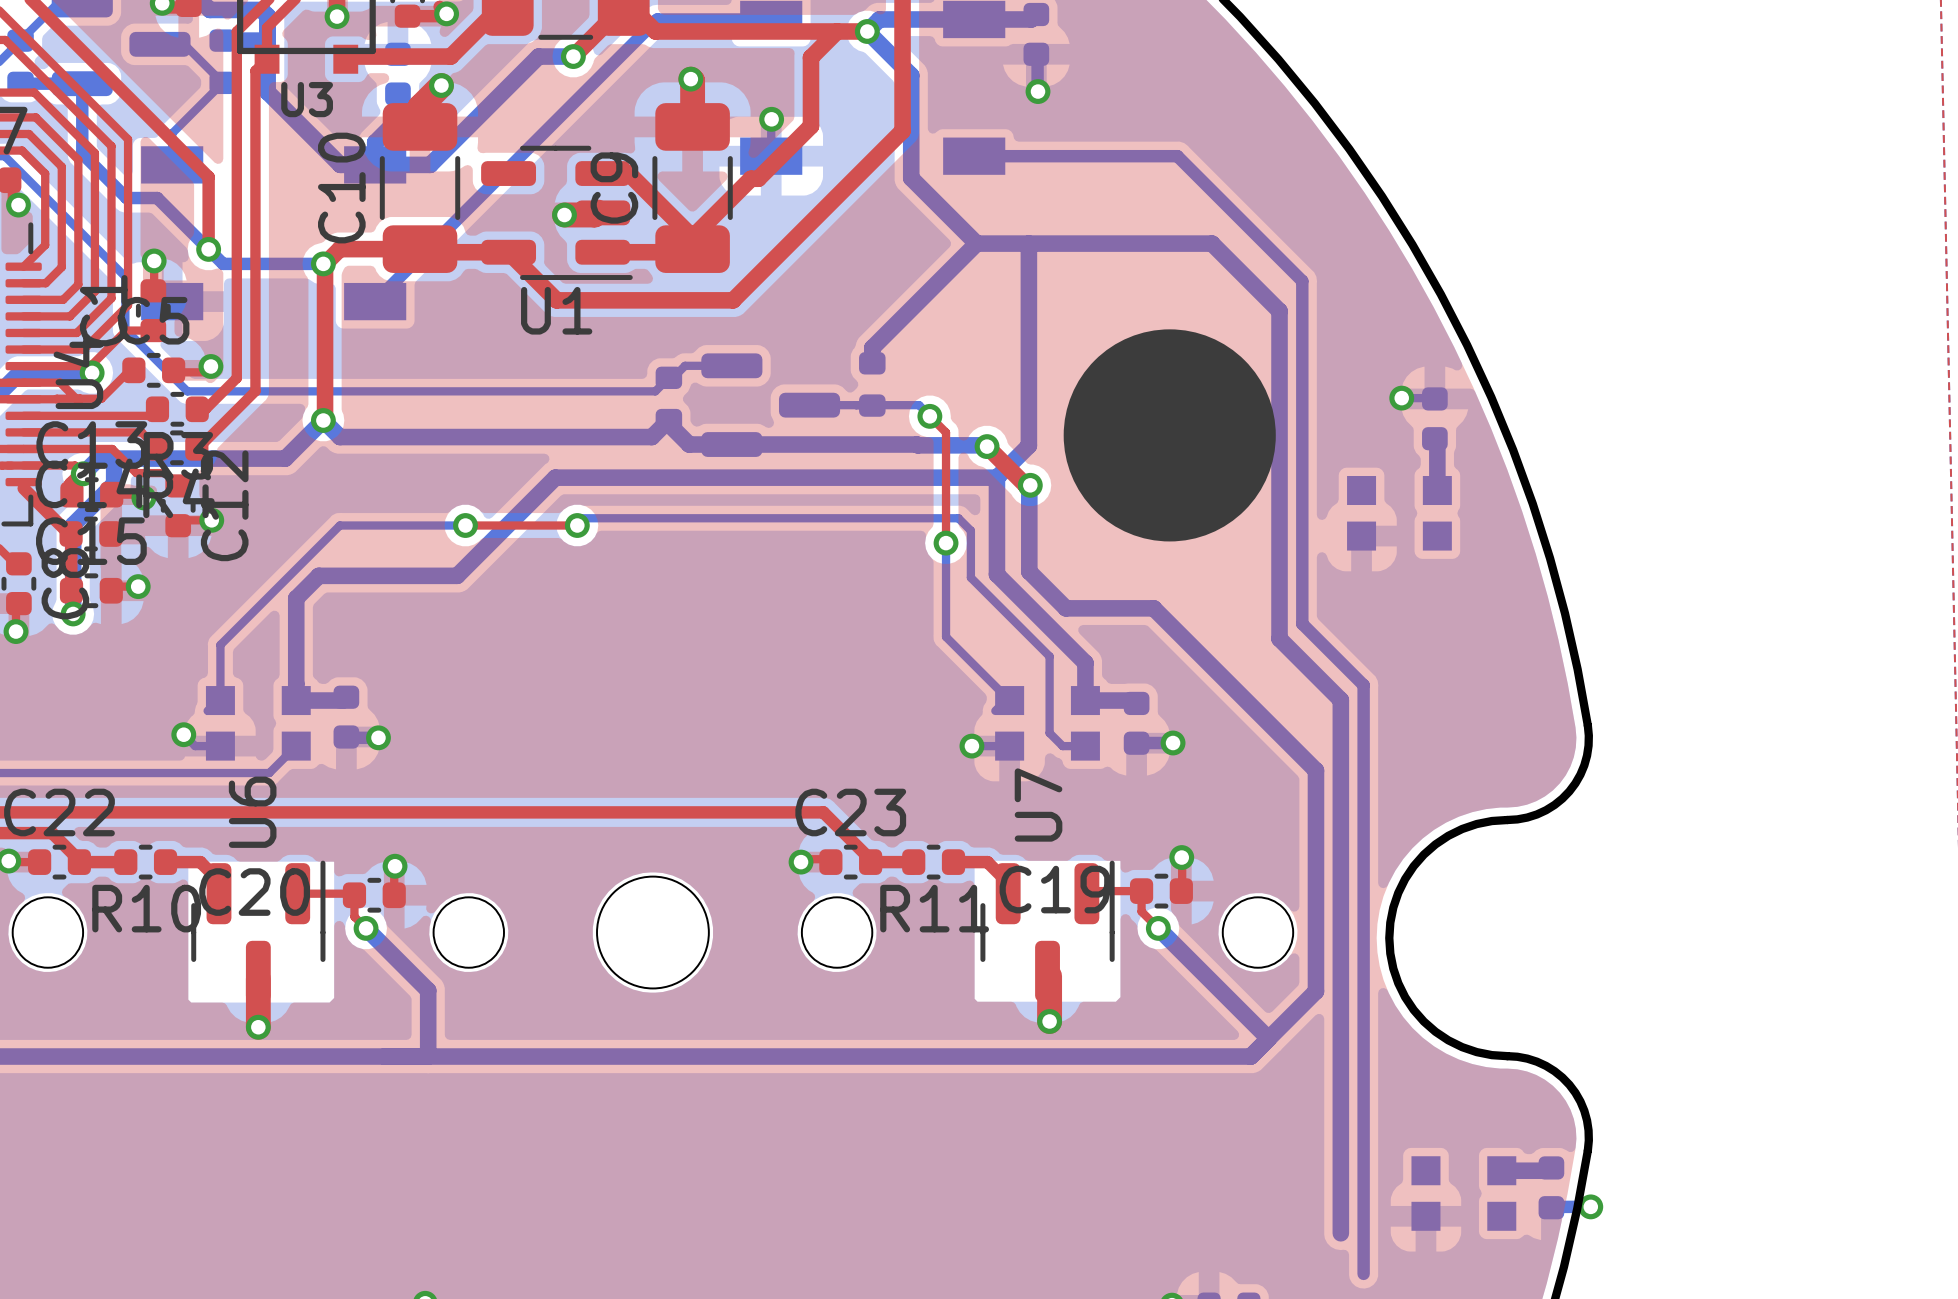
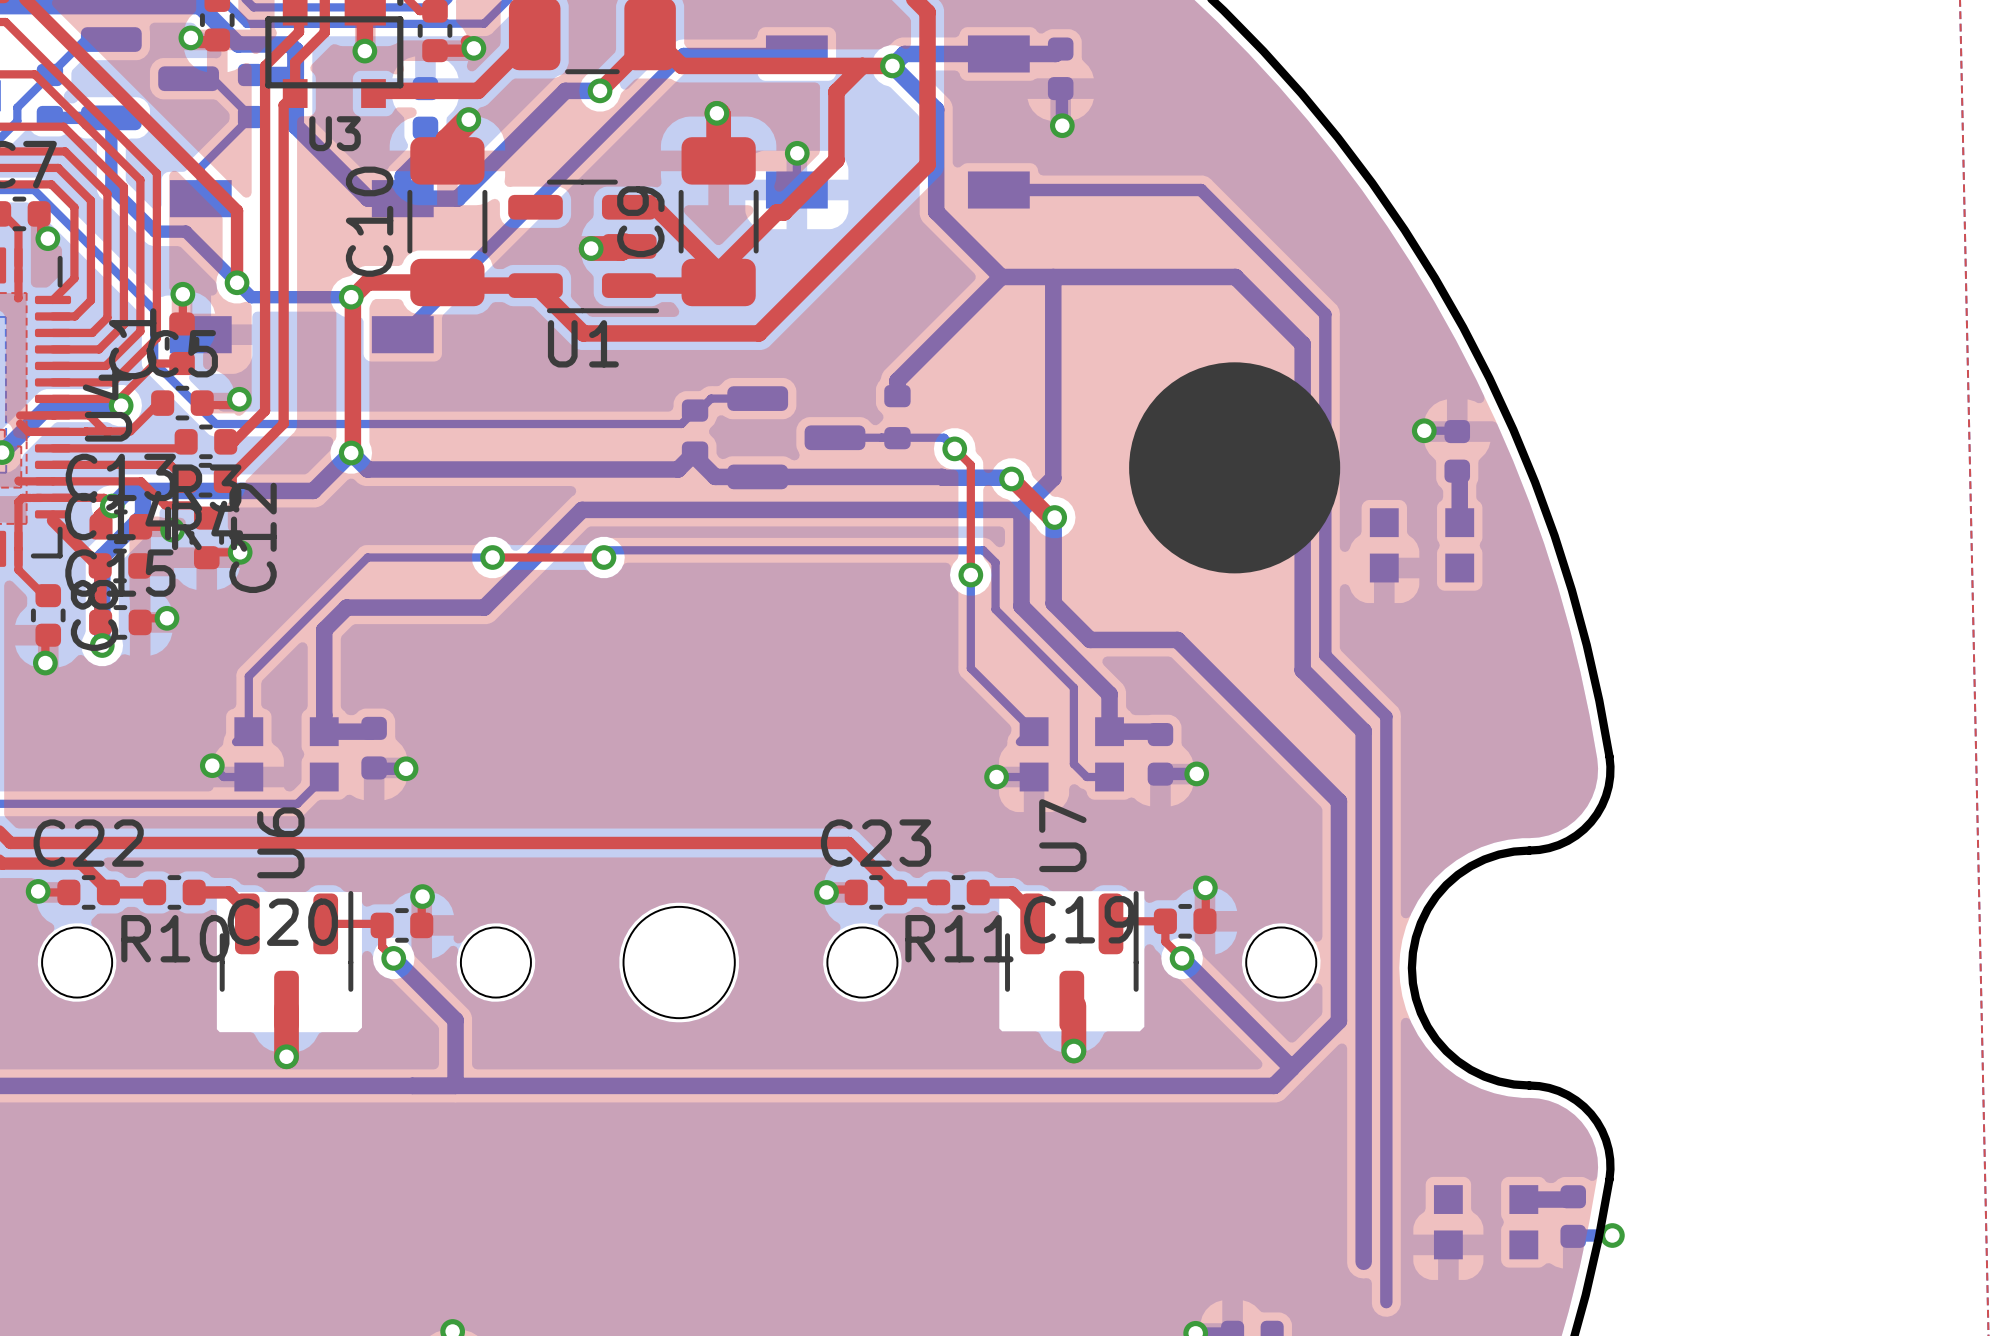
drawing position: (1169, 435) -> (1234, 467)

